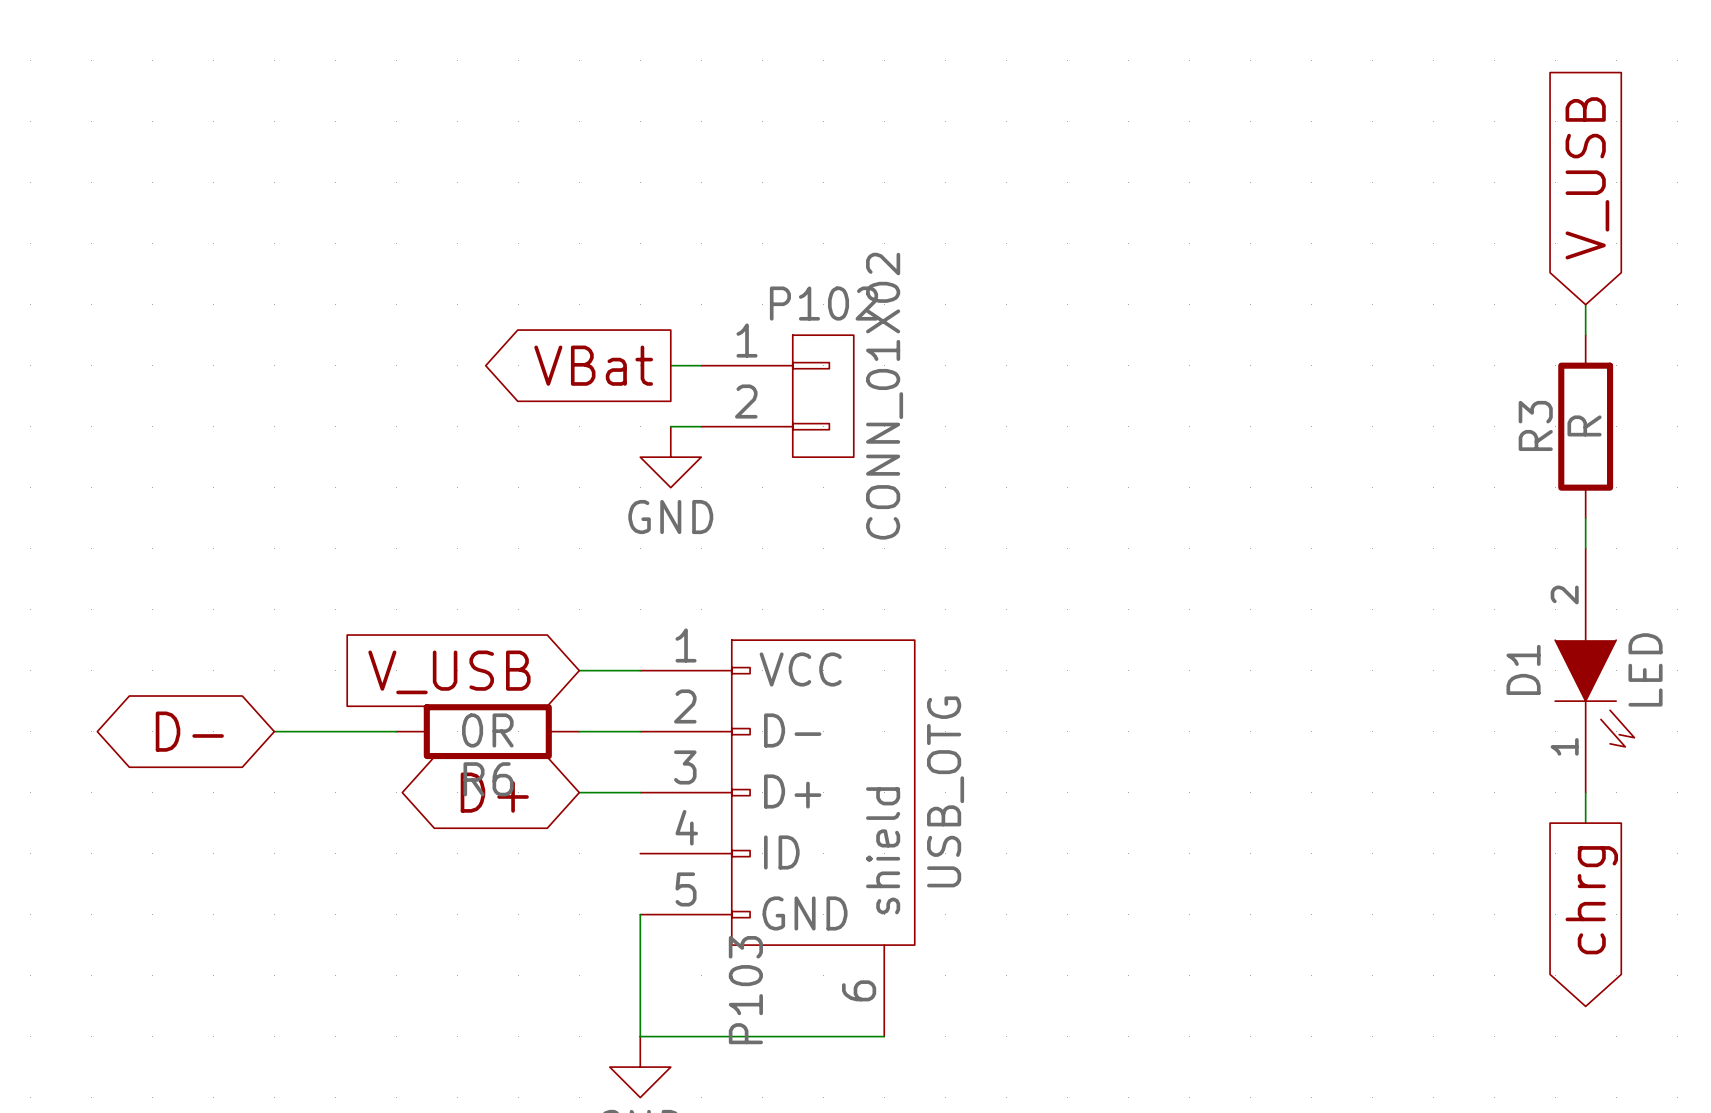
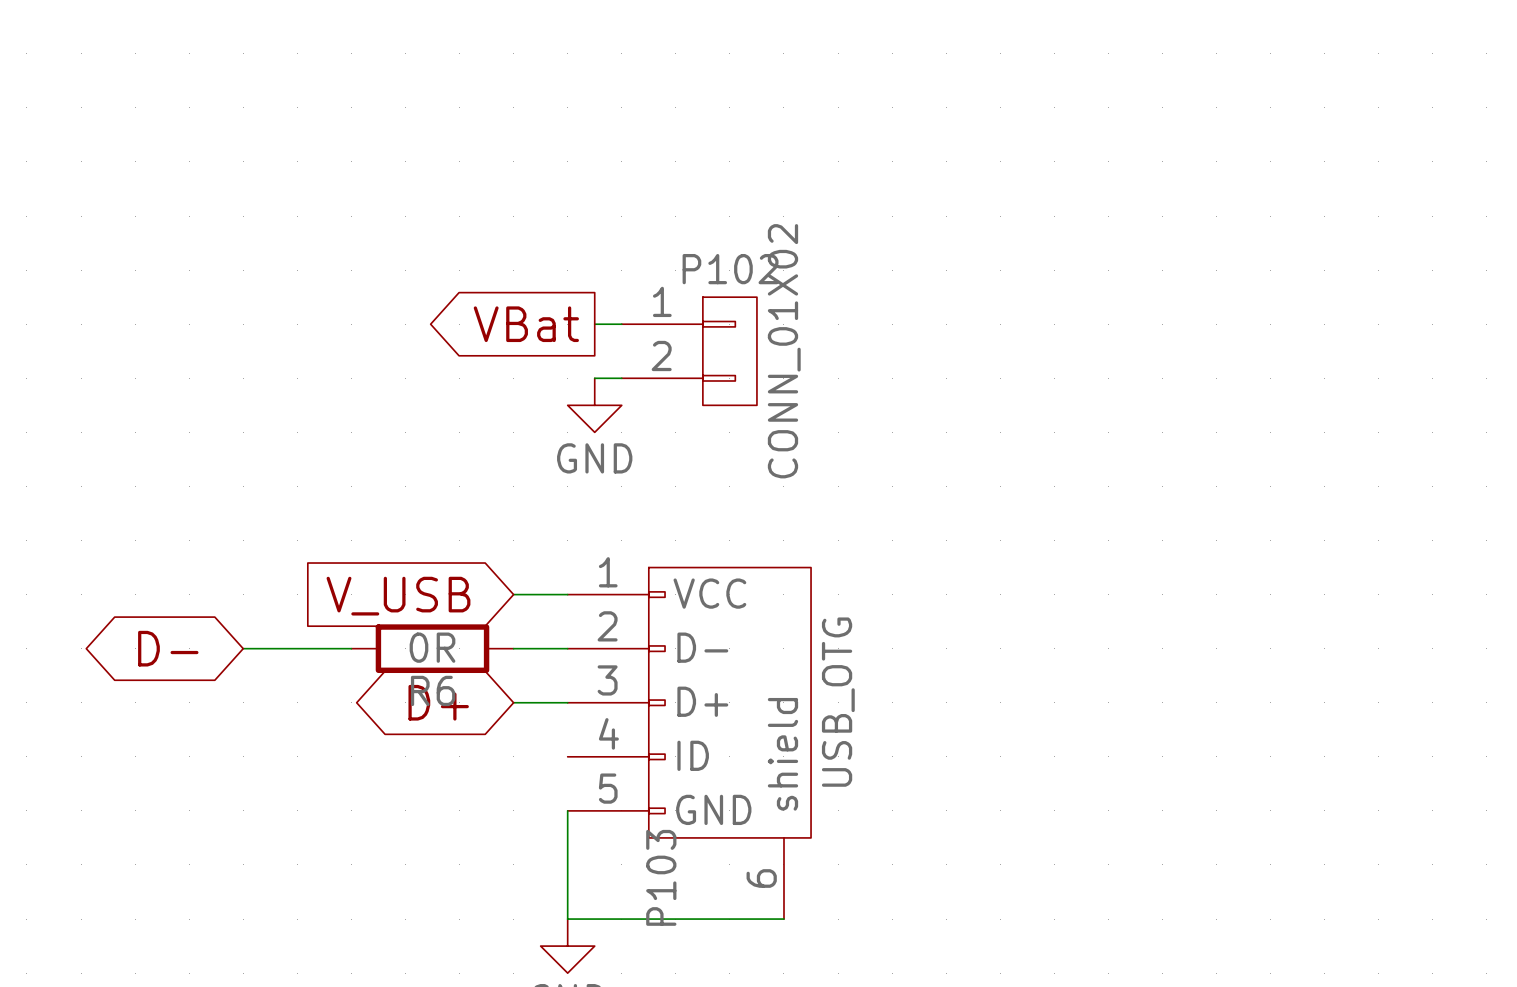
global label: V_USB (1587, 178) -> none
wire: (1585, 304) (1585, 335) -> none
R3: R (1585, 426) -> none
wire: (1585, 518) (1585, 548) -> none
D1: LED (1594, 670) -> none
wire: (1585, 792) (1585, 823) -> none
global label: chrg (1591, 900) -> none

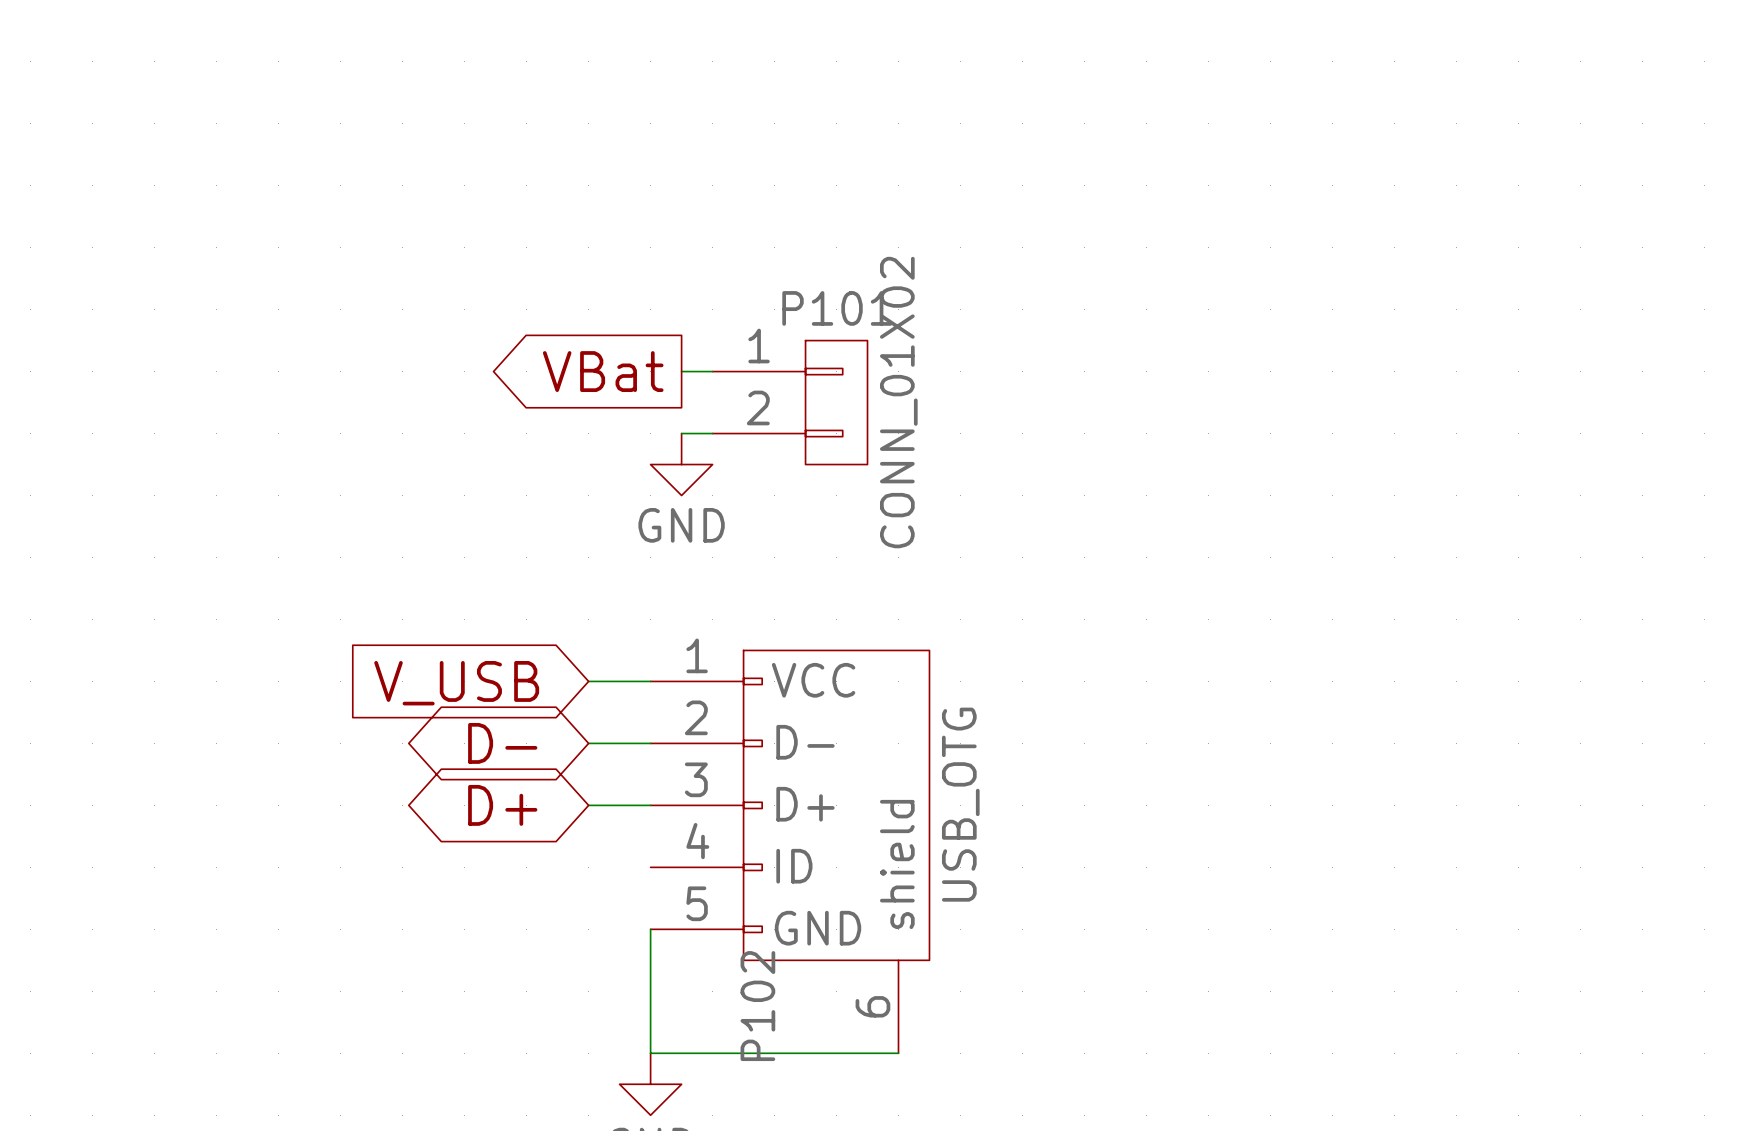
P102 name: P102 (730, 269) -> P101 (837, 308)
global label position: D- (168, 648) -> D- (502, 743)
wire: (243, 648) (351, 648) -> none
R6: 0R (432, 648) -> none
P103 name: P103 (661, 877) -> P102 (757, 1006)

